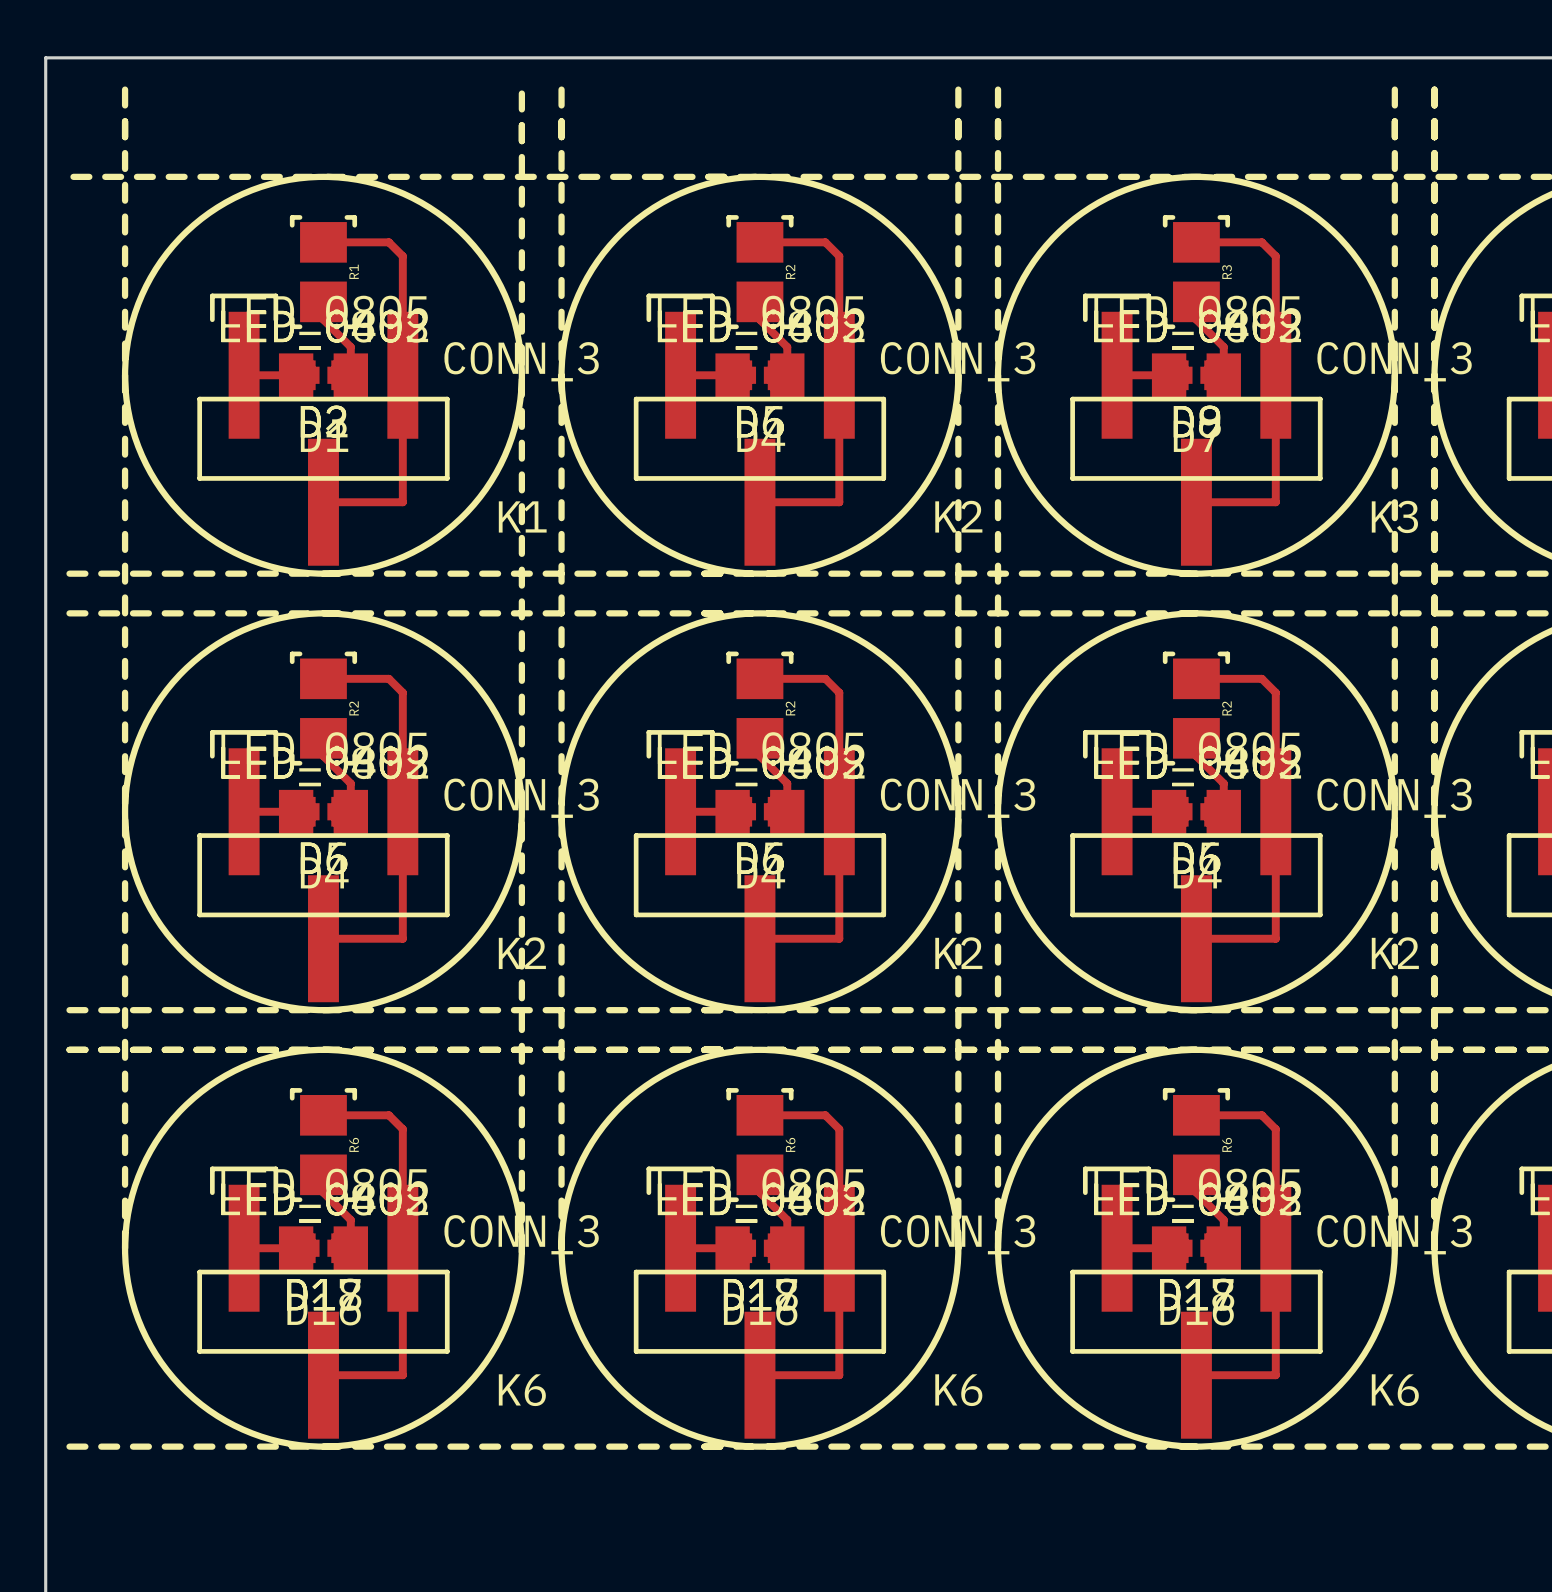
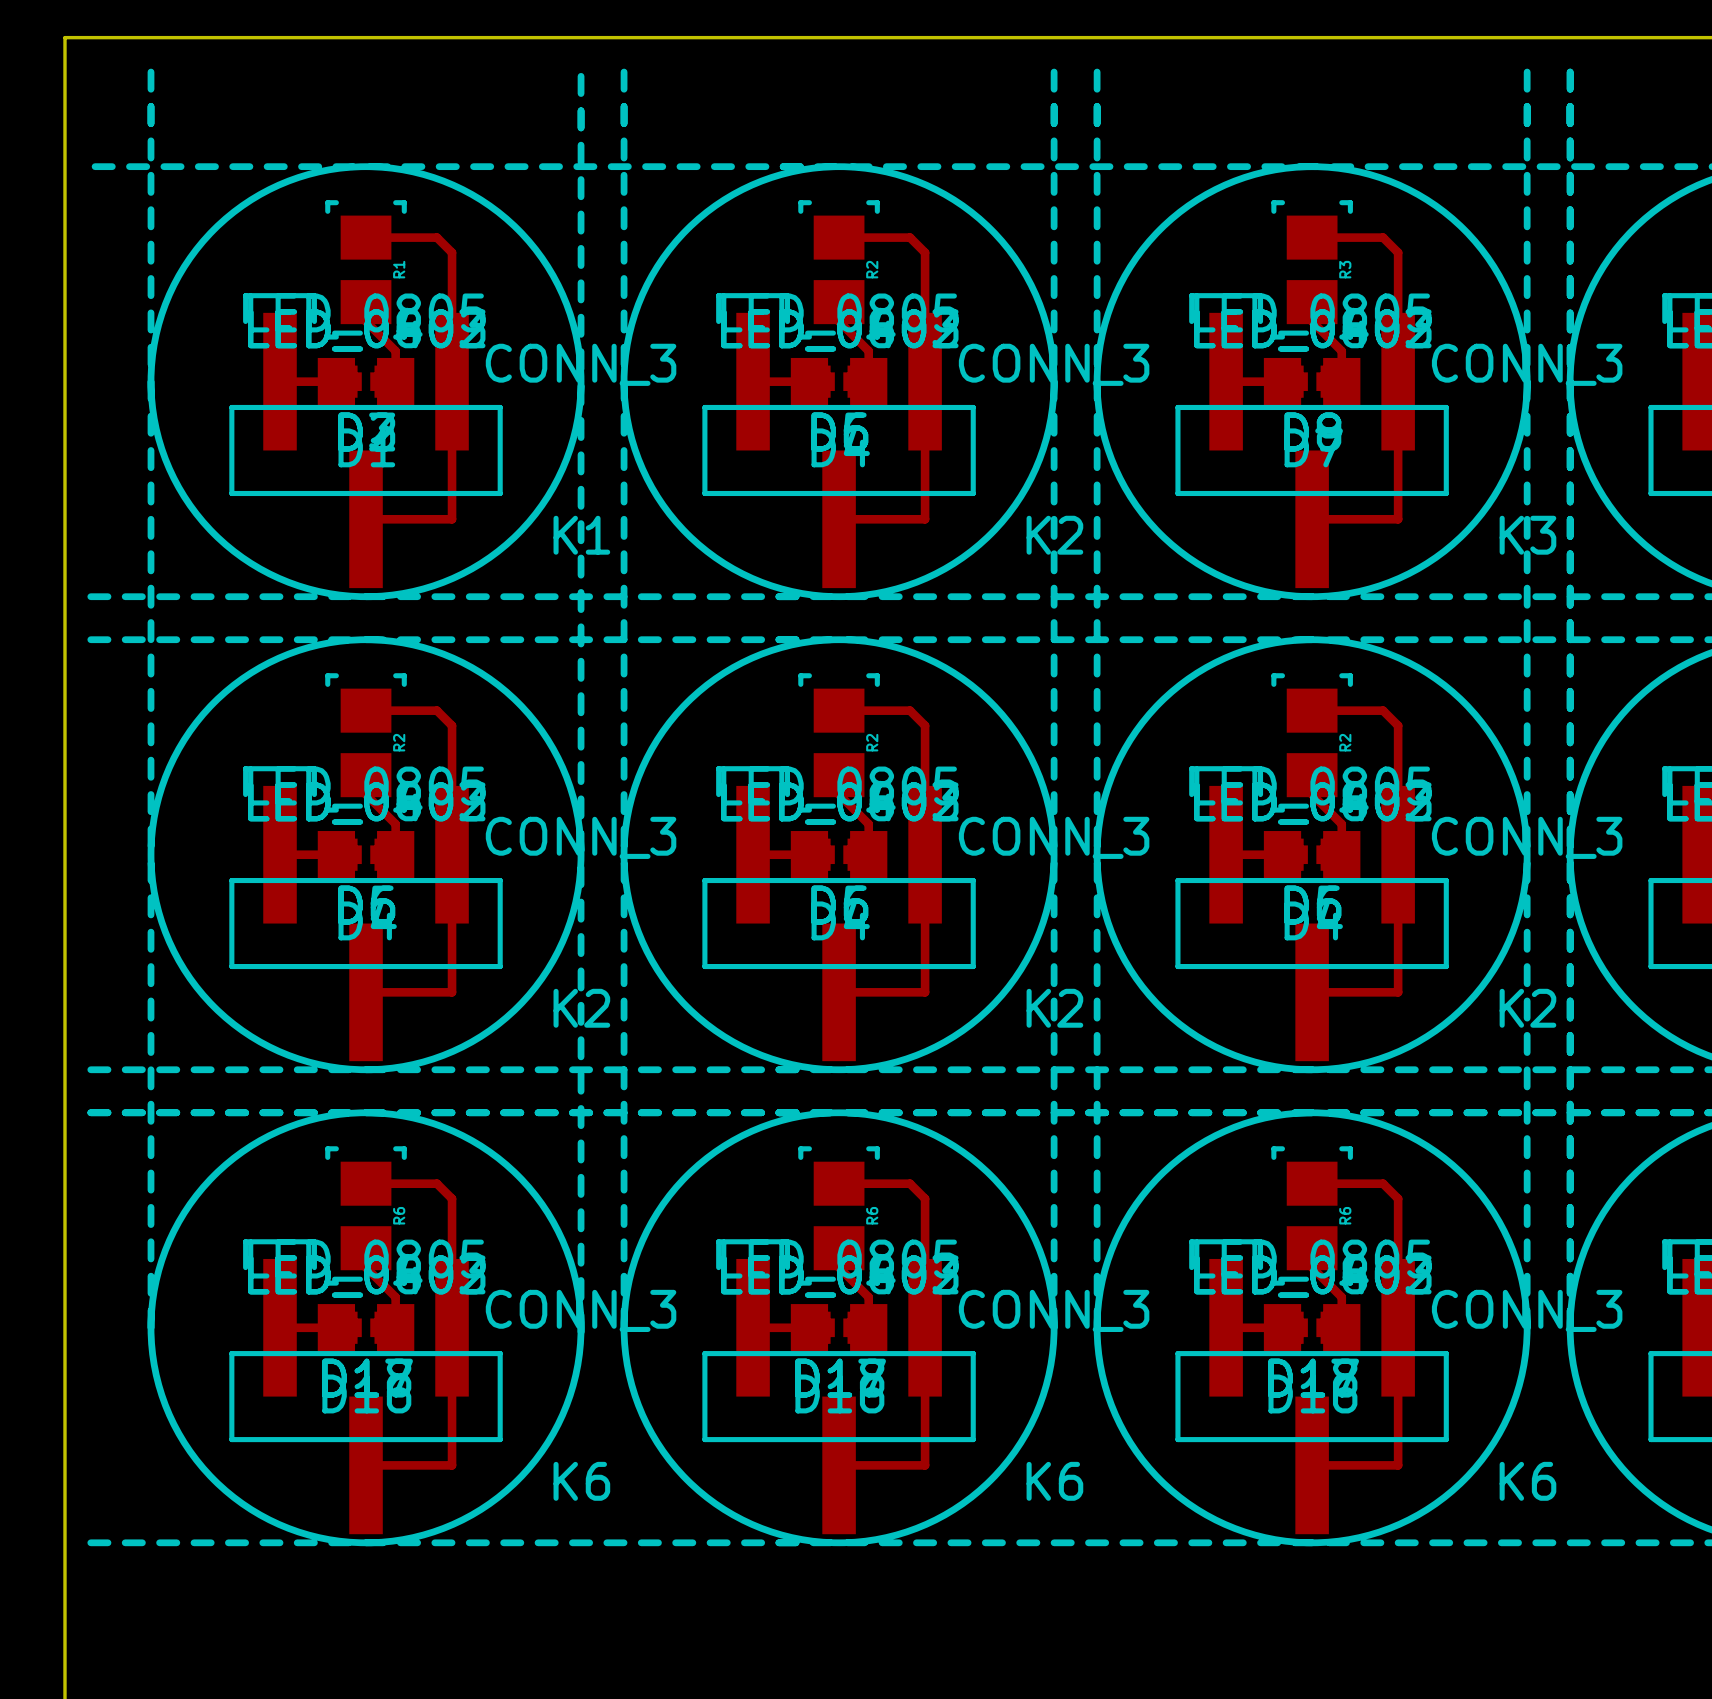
R1 footprint: [289, 215, 358, 330] -> [325, 200, 407, 340]
R2 footprint: [726, 215, 794, 330] -> [798, 200, 880, 340]
R3 footprint: [1162, 215, 1231, 330] -> [1271, 200, 1353, 340]
R2 footprint: [289, 651, 358, 766] -> [325, 673, 407, 813]
R2 footprint: [726, 651, 794, 766] -> [798, 673, 880, 813]
R2 footprint: [1162, 651, 1231, 766] -> [1271, 673, 1353, 813]
R6 footprint: [289, 1088, 358, 1203] -> [325, 1146, 407, 1286]
R6 footprint: [726, 1088, 794, 1203] -> [798, 1146, 880, 1286]
R6 footprint: [1162, 1088, 1231, 1203] -> [1271, 1146, 1353, 1286]

